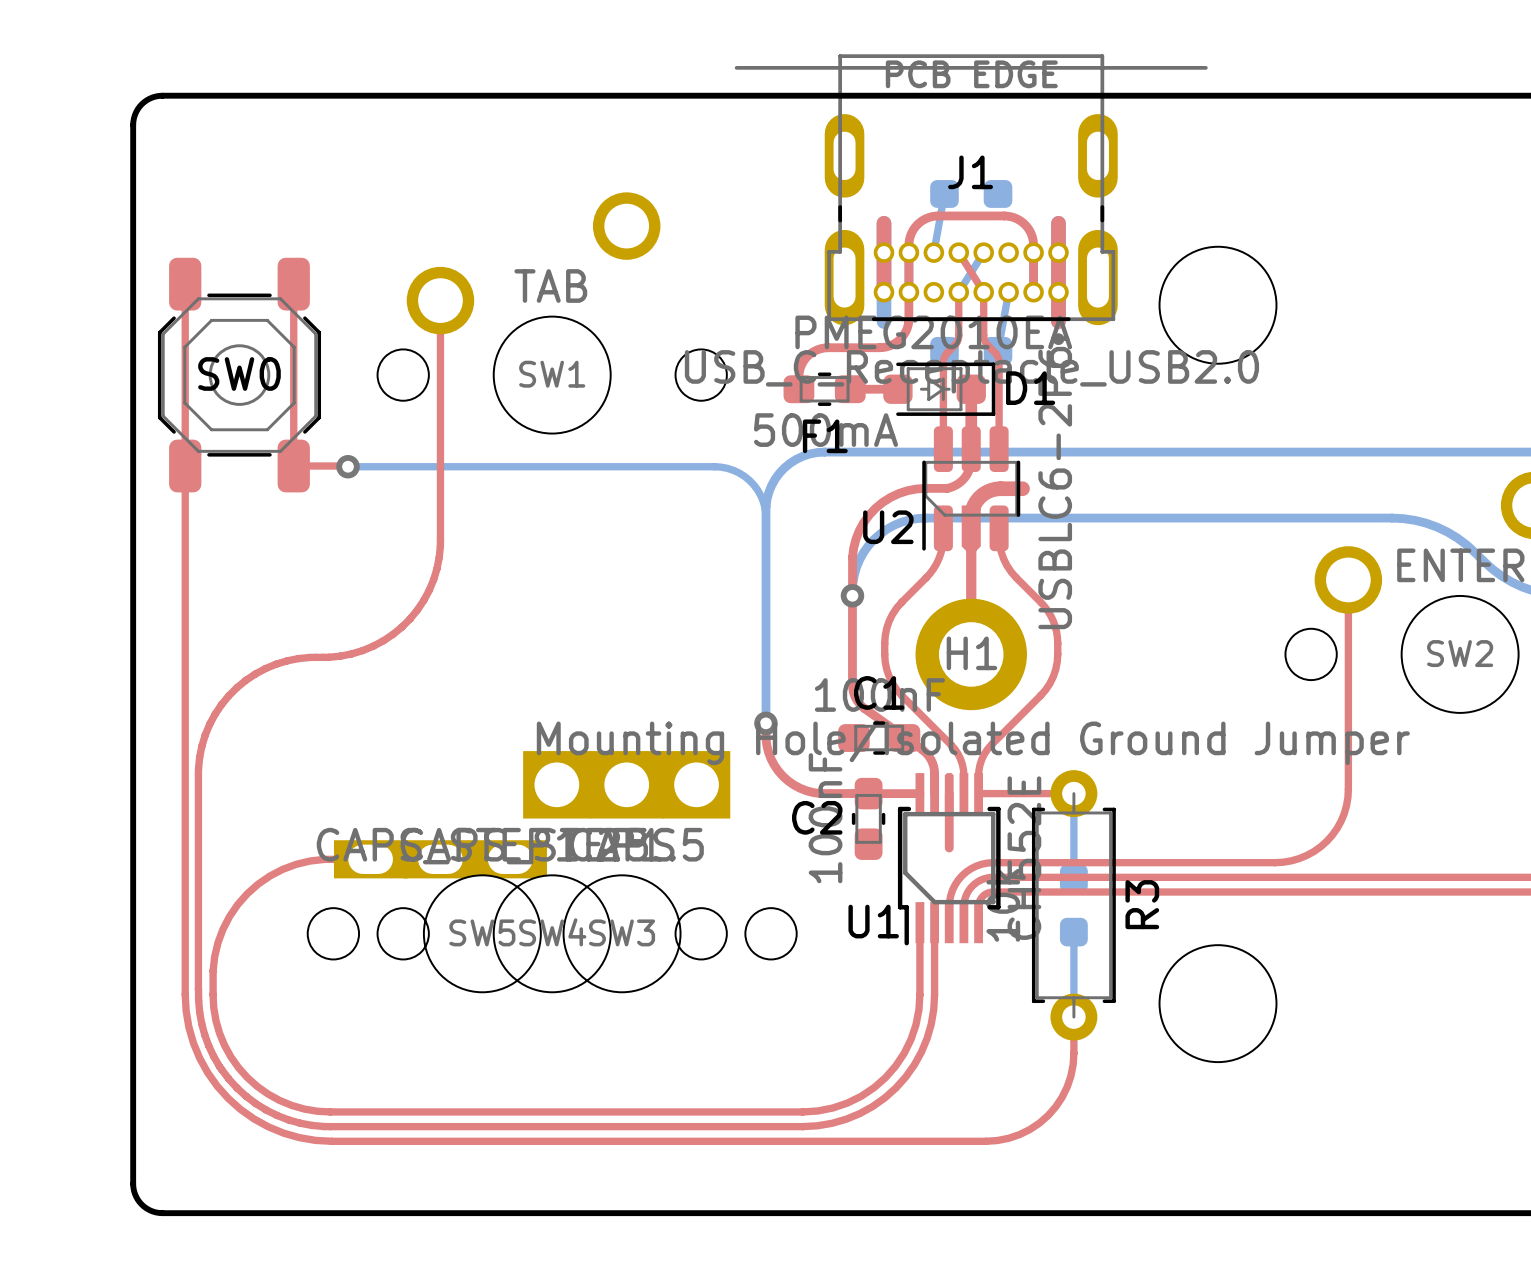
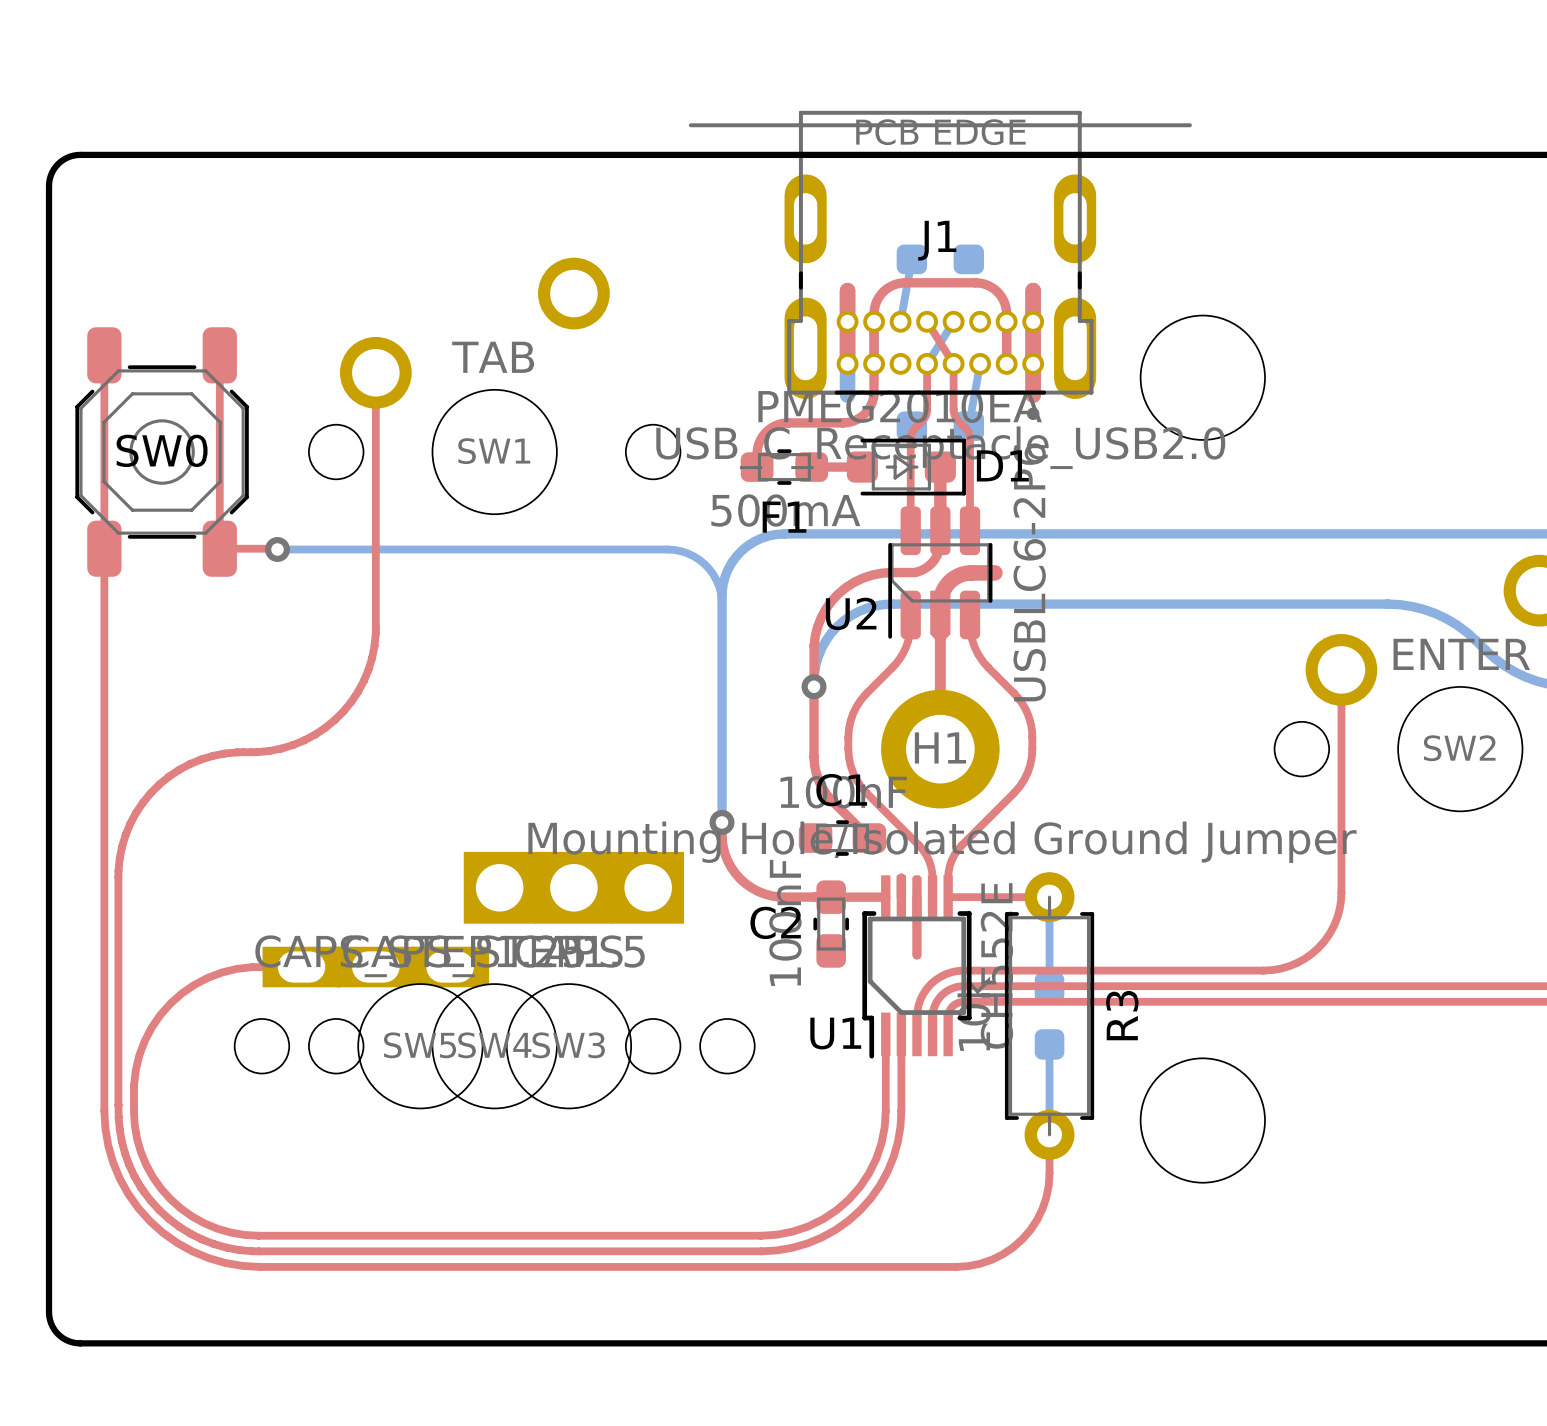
top track: (852, 661) (852, 688) (857, 701) (864, 708) (925, 751) (932, 763) (934, 775) -> (814, 756) (818, 780) (826, 794) (869, 838)

